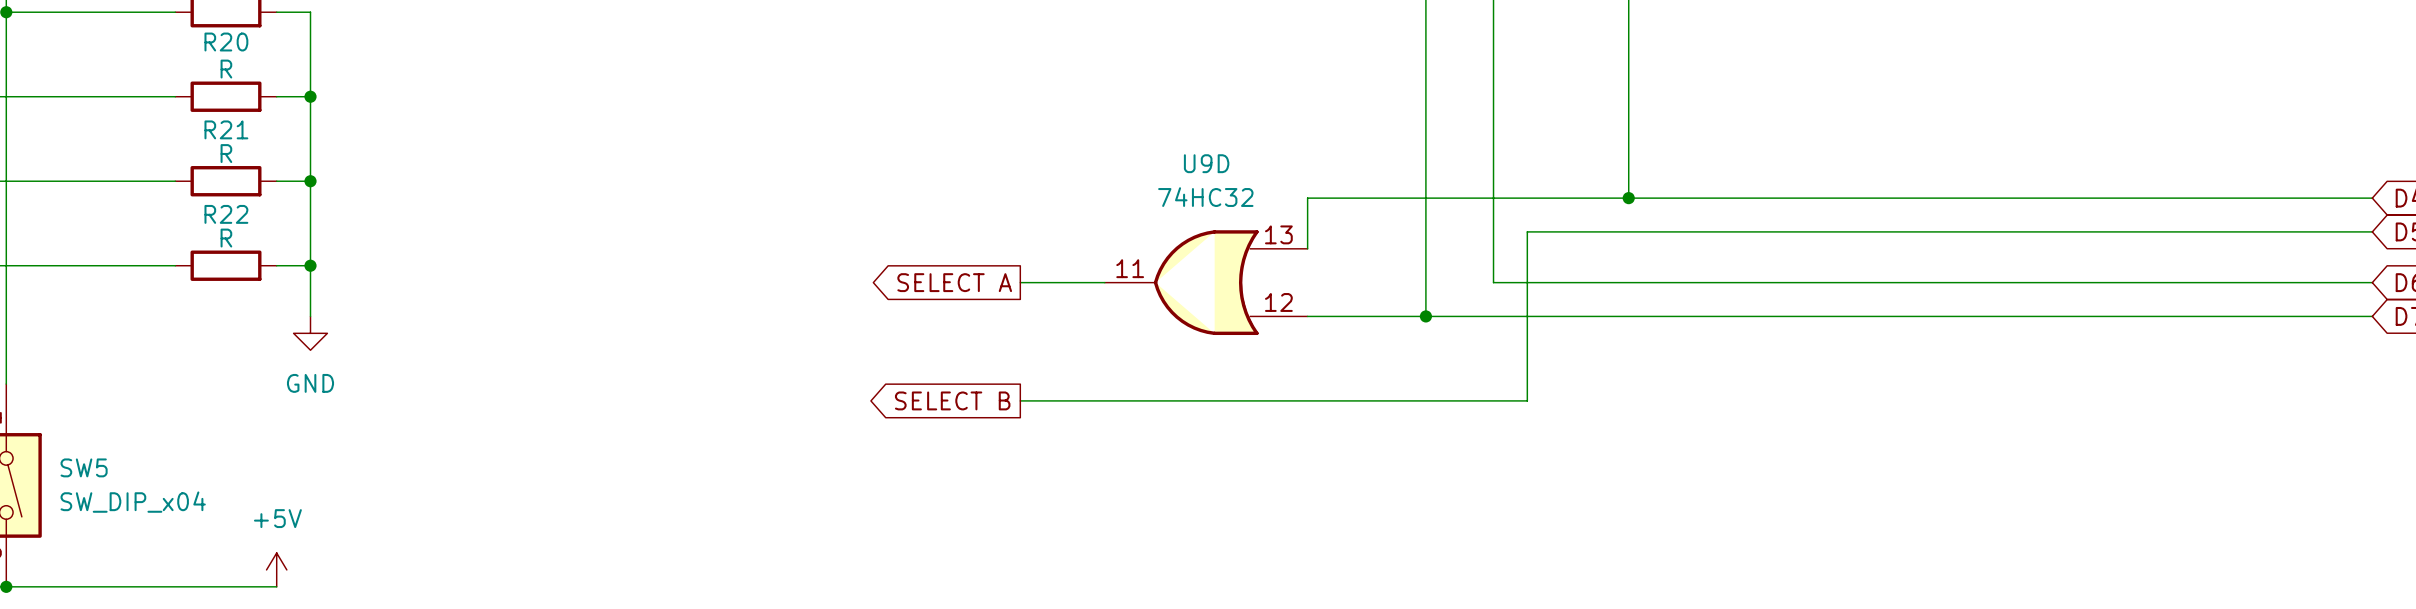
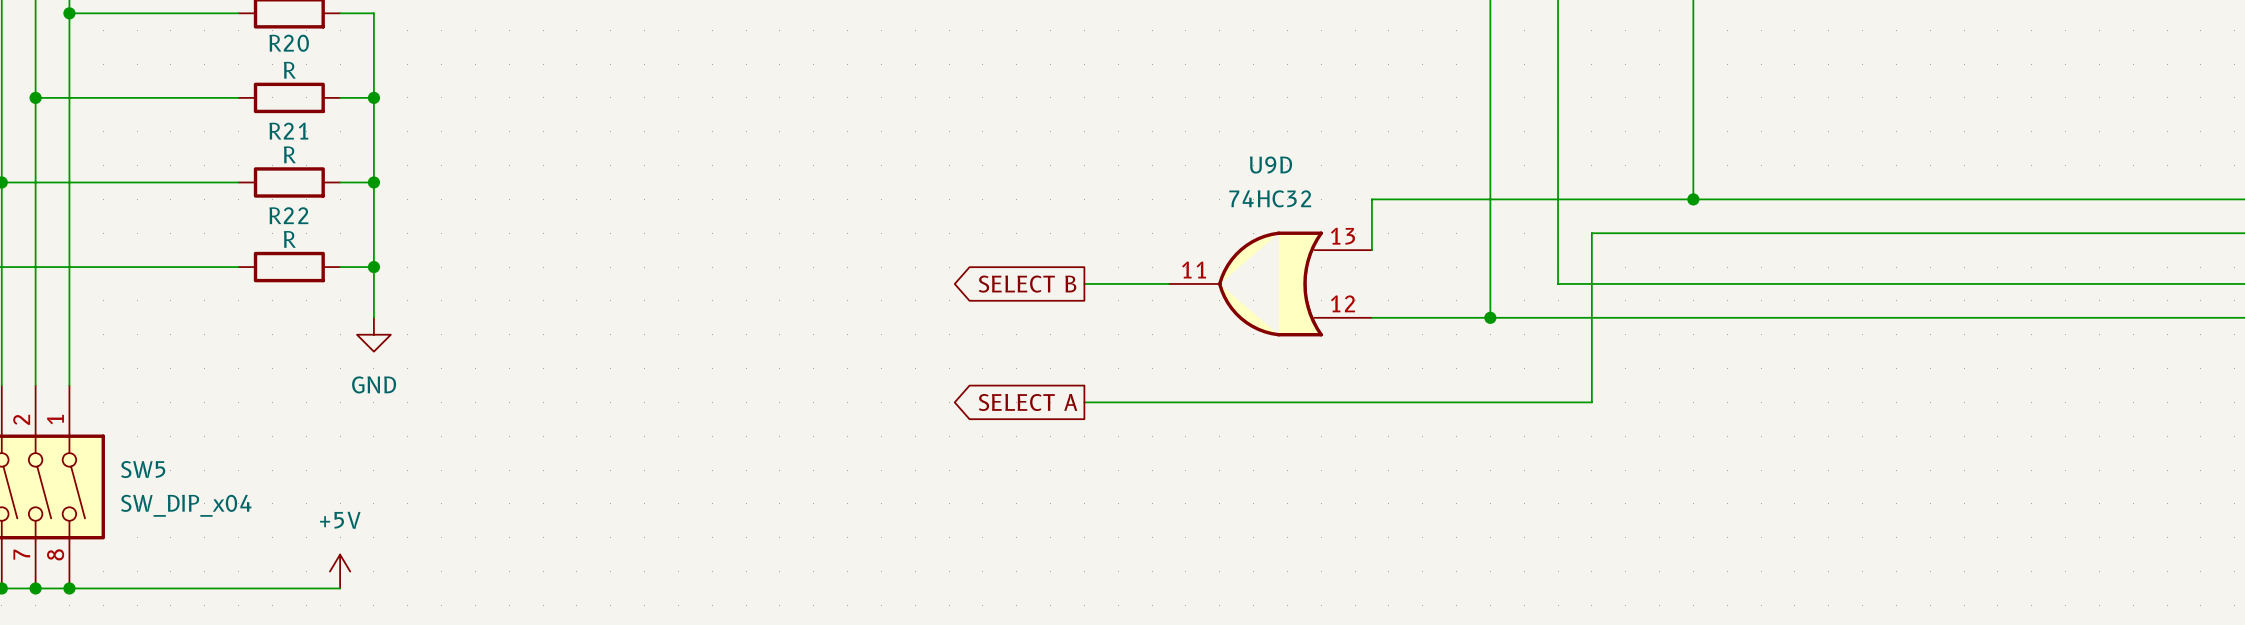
global label: SELECT A (954, 282) -> SELECT B (1027, 284)
global label: SELECT B (952, 400) -> SELECT A (1028, 402)

